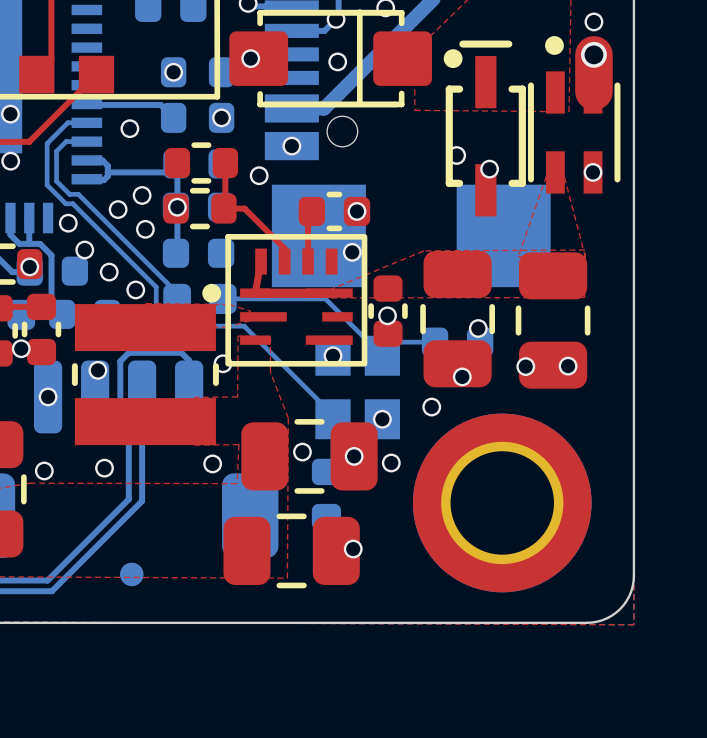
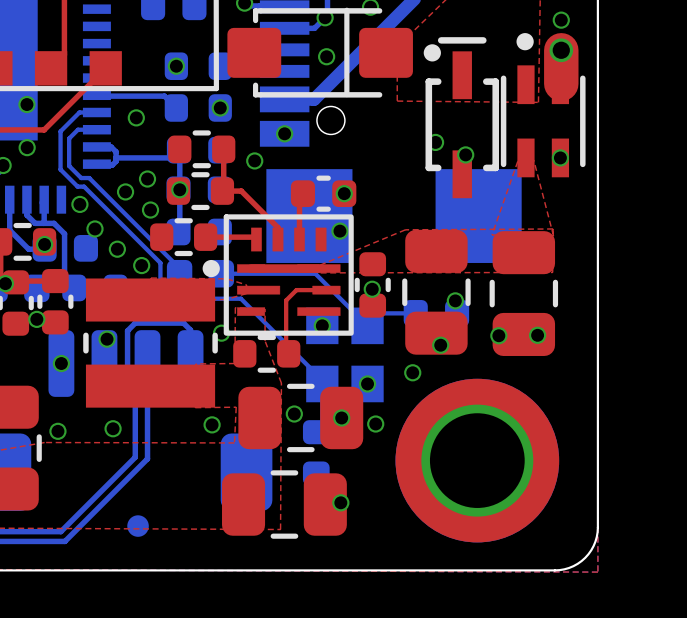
part footprint: [229, 9, 463, 108] -> [227, 7, 441, 98]
via: (250, 58) -> none
part: none -> (183, 237)
top track: none -> (205, 237) (254, 237)
top track: (261, 261) (255, 293) -> none
top track: none -> (326, 290) (296, 290) (286, 300) (286, 351) (288, 353)
part: none -> (266, 353)

